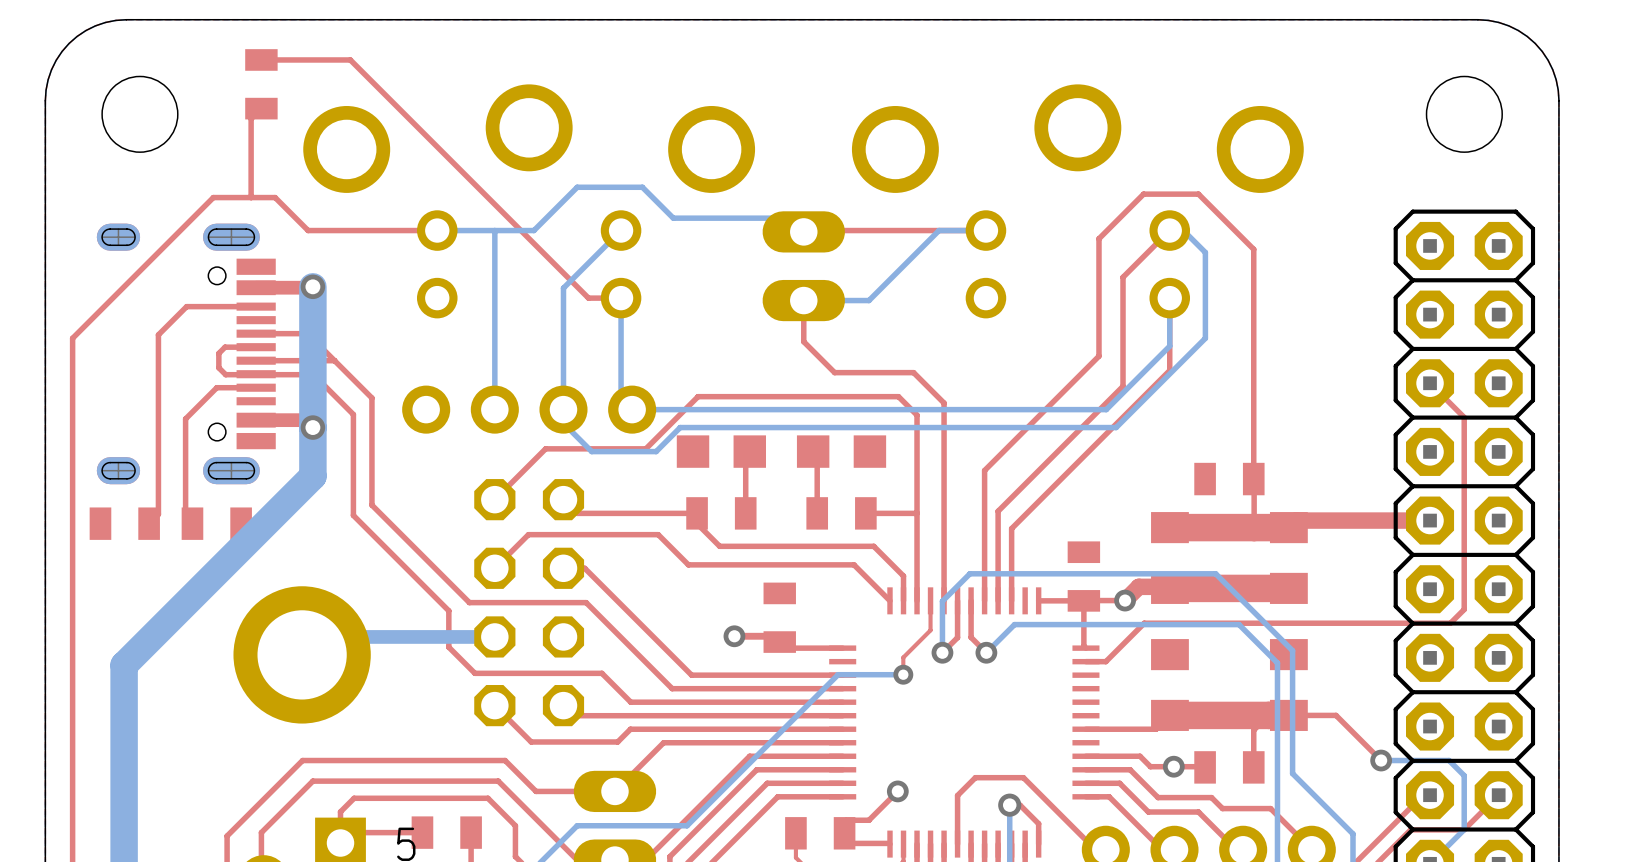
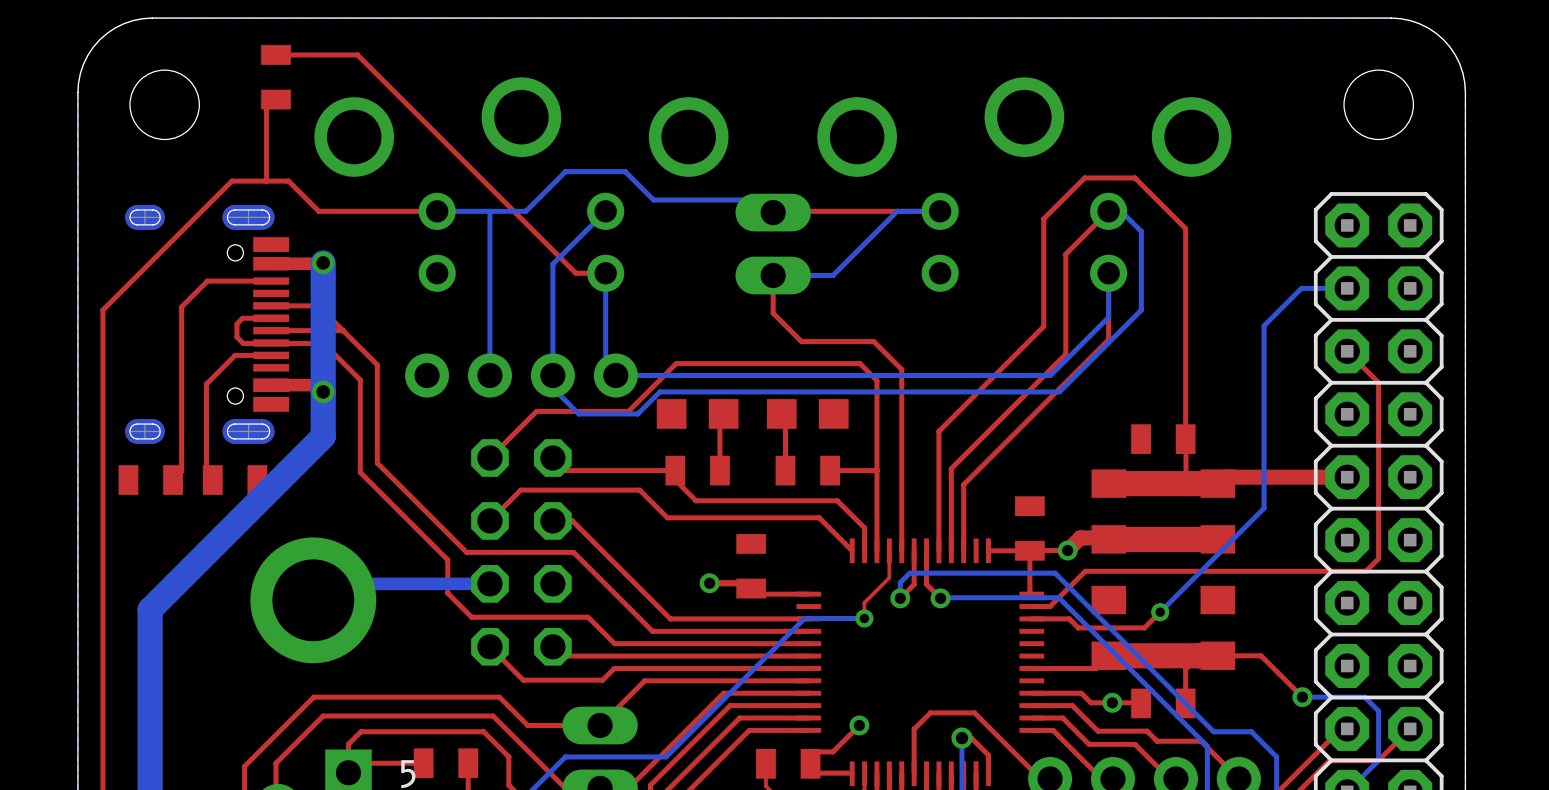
bottom track: none -> (1347, 288) (1301, 288) (1264, 325) (1264, 508) (1160, 612)
bottom track: (942, 635) (942, 601) (969, 573) (1215, 573) (1292, 650) (1292, 773) (1353, 833) -> (900, 582) (909, 573) (1055, 573) (1213, 731) (1251, 731) (1276, 756) (1276, 764)
bottom track: (987, 652) (1014, 624) (1239, 624) (1277, 663) (1277, 814) -> (941, 597) (1058, 597) (1207, 746)
top track: none -> (1160, 612) (1144, 627) (1078, 627) (1069, 618) (1031, 618)
via: none -> (1160, 612)

